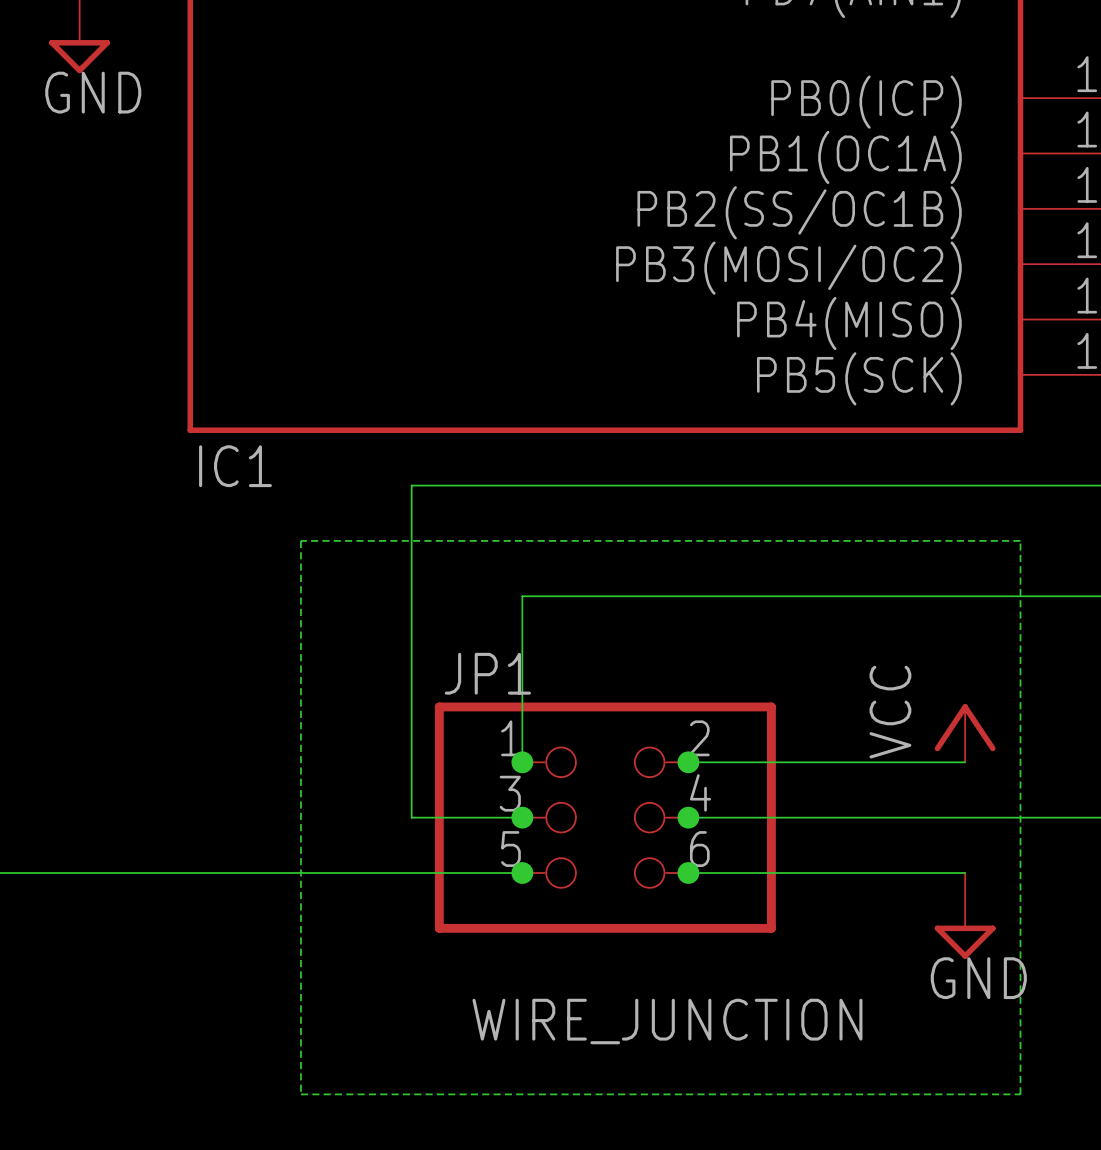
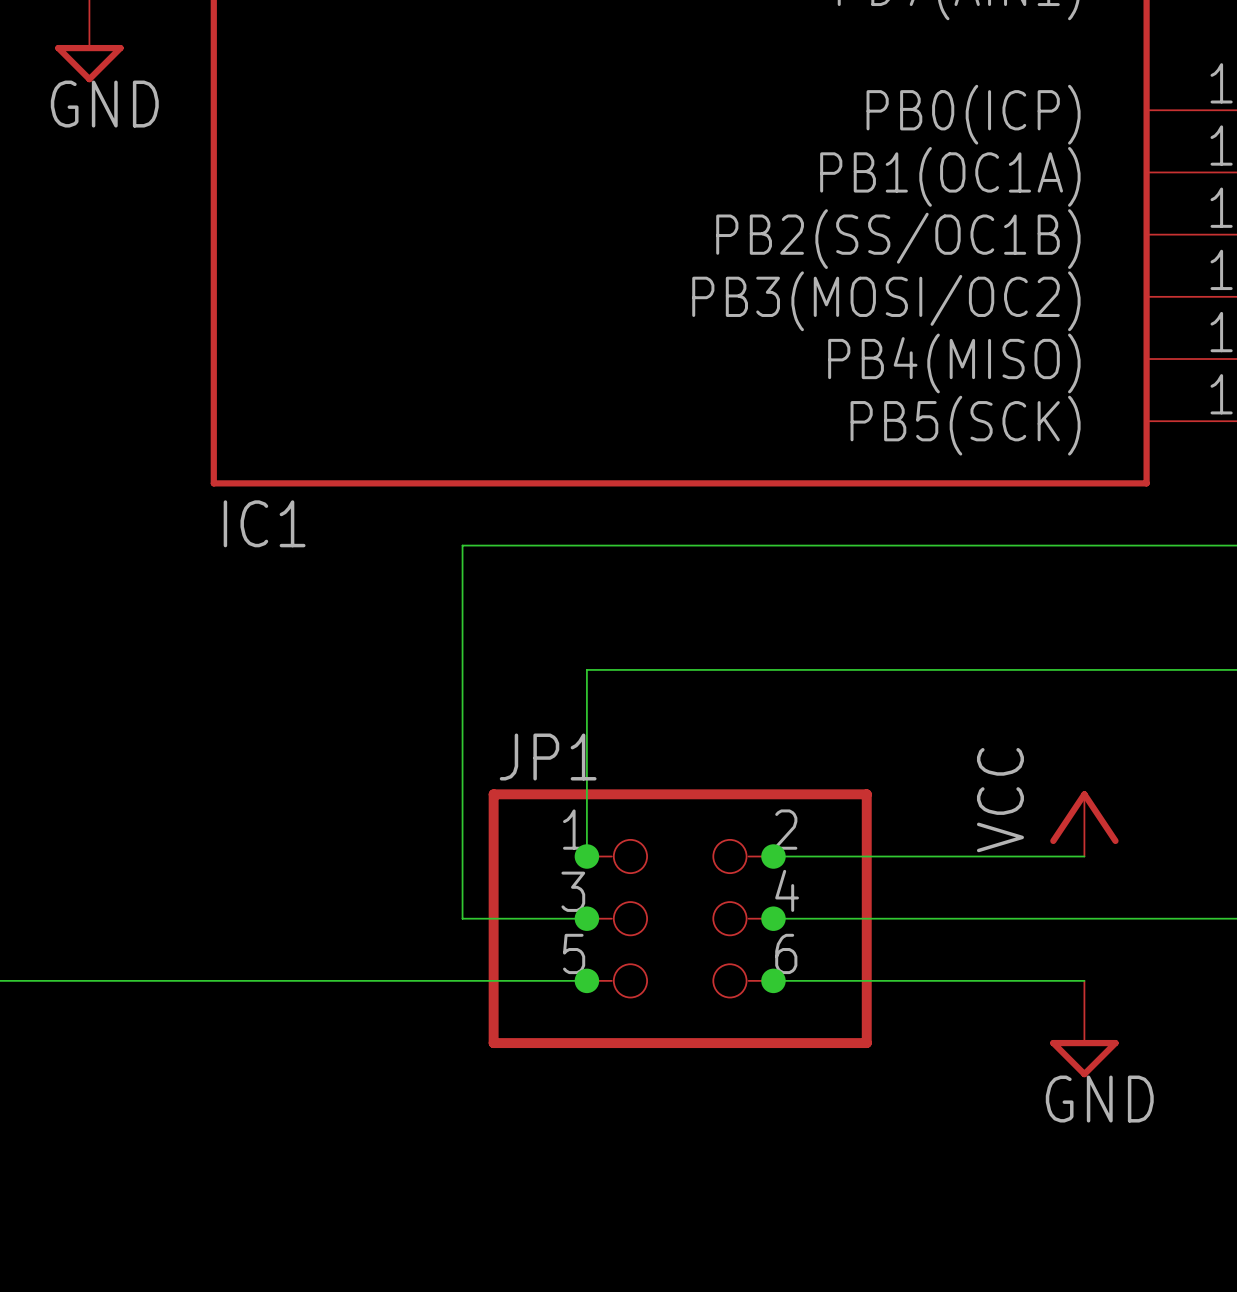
wire: (300, 540) (1020, 540) (1020, 1094) (300, 1094) (300, 540) -> none
label: WIRE_JUNCTION (667, 1021) -> none

